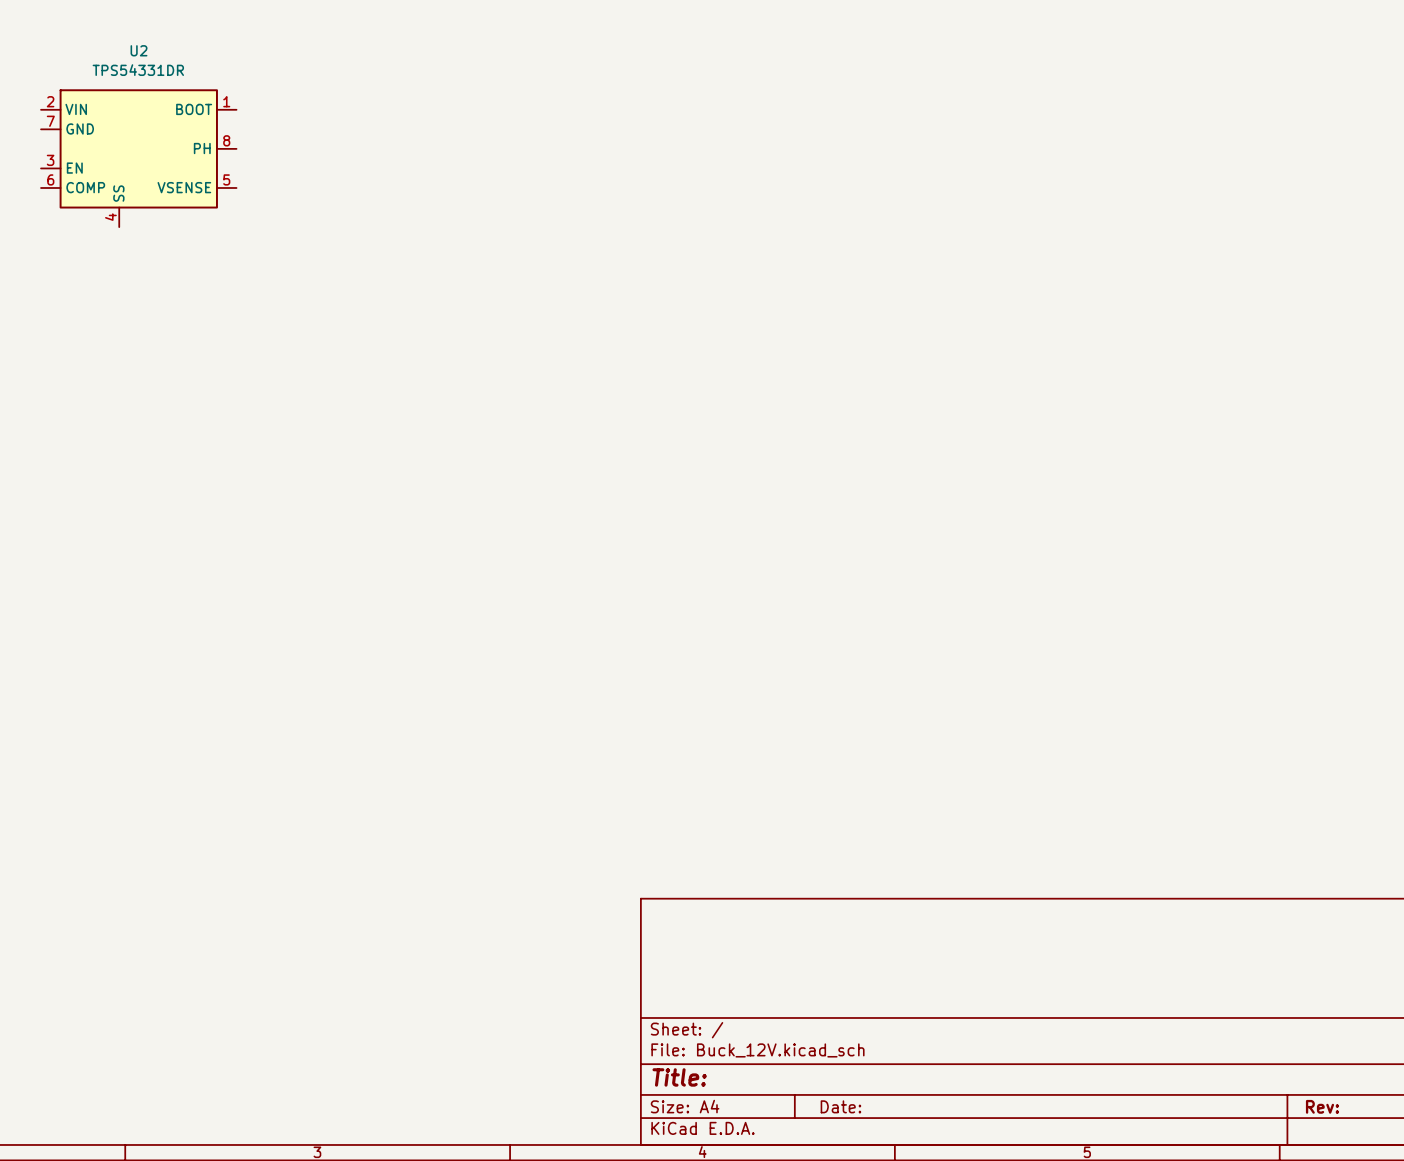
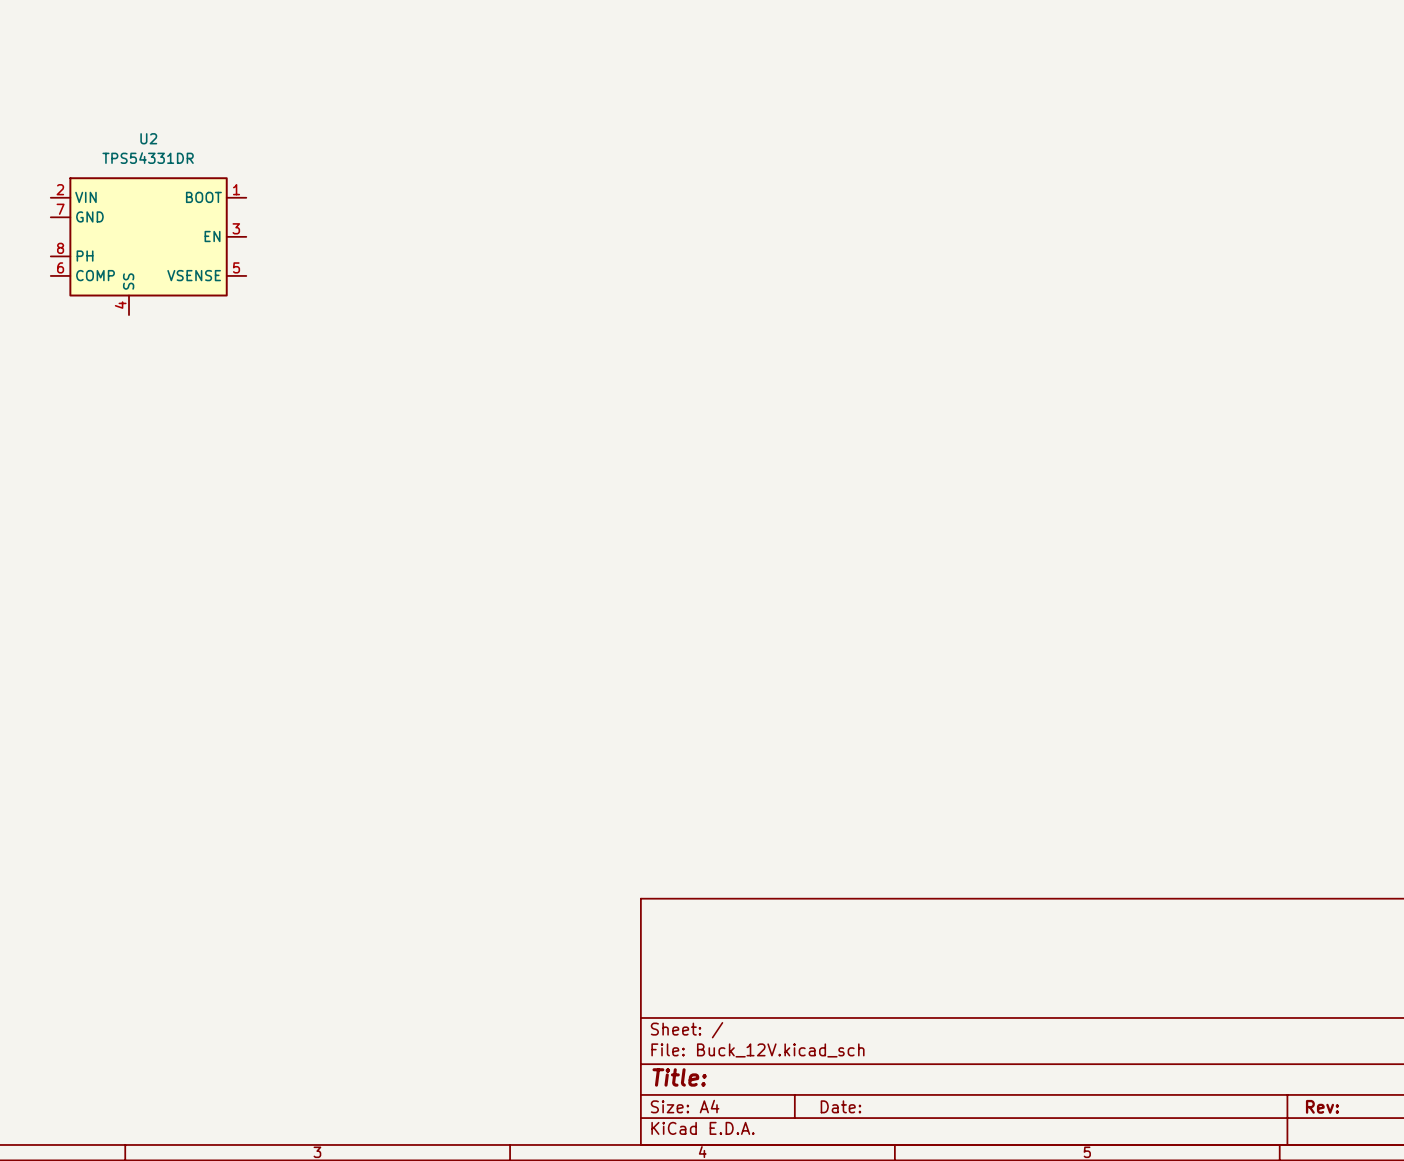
U2 pin number: 8 (226, 140) -> 3 (236, 228)
U2 pin name: PH (202, 148) -> EN (212, 236)
U2 position: (138, 158) -> (148, 246)
U2 pin number: 3 (50, 160) -> 8 (60, 248)
U2 pin name: EN (74, 168) -> PH (85, 256)

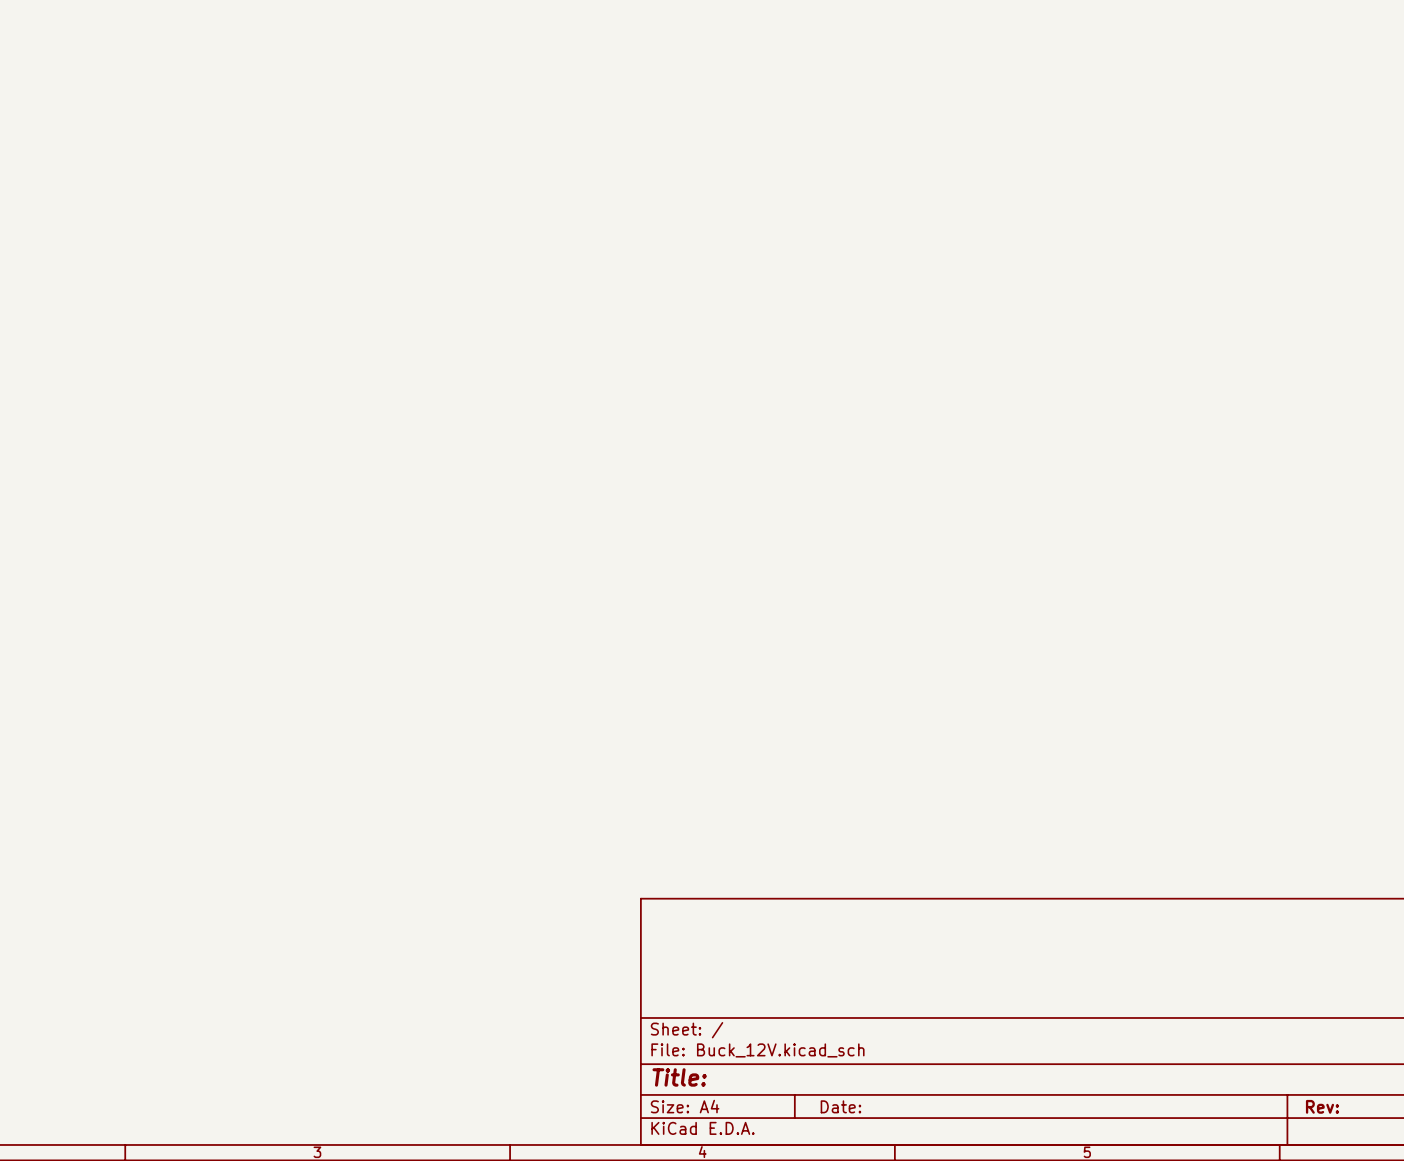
U2: TPS54331DR (148, 246) -> none

